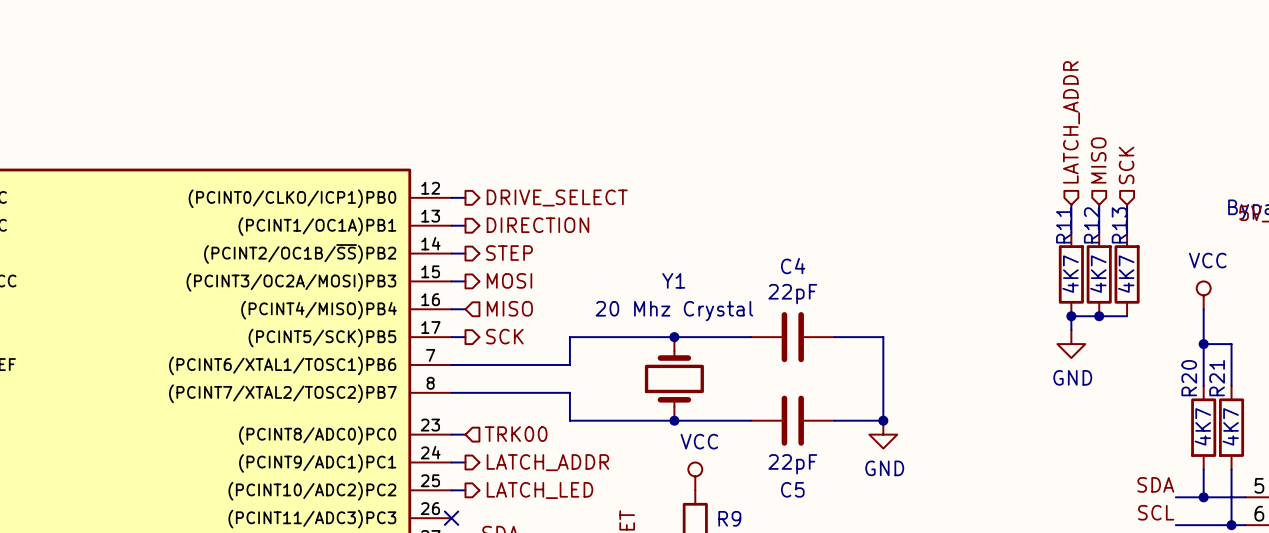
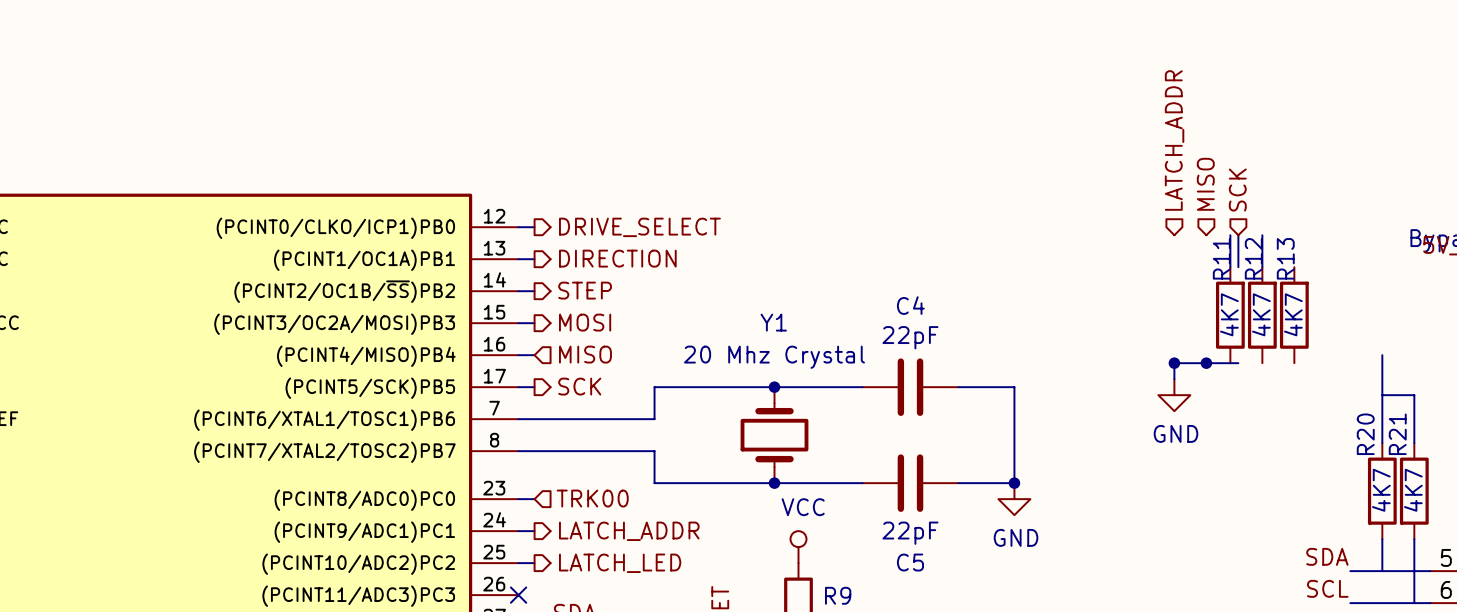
hierarchical label position: LATCH_ADDR (1071, 122) -> LATCH_ADDR (1174, 140)
hierarchical label position: MISO (1098, 160) -> MISO (1205, 184)
hierarchical label position: SCK (1126, 165) -> SCK (1237, 190)
wire: (1127, 204) (1127, 232) -> (1238, 235) (1238, 267)
power symbol: VCC (1203, 295) -> none
junction: none -> (1174, 363)
wire: (1071, 316) (1071, 330) -> (1230, 363) (1174, 363) (1174, 379)
junction position: (1071, 316) -> (1206, 363)
wire: (1078, 316) (1127, 316) -> none
junction: (1099, 316) -> none
power symbol position: GND (1071, 344) -> GND (1174, 395)
junction: (1203, 344) -> none
junction: (1203, 497) -> none
junction: (1231, 525) -> none

